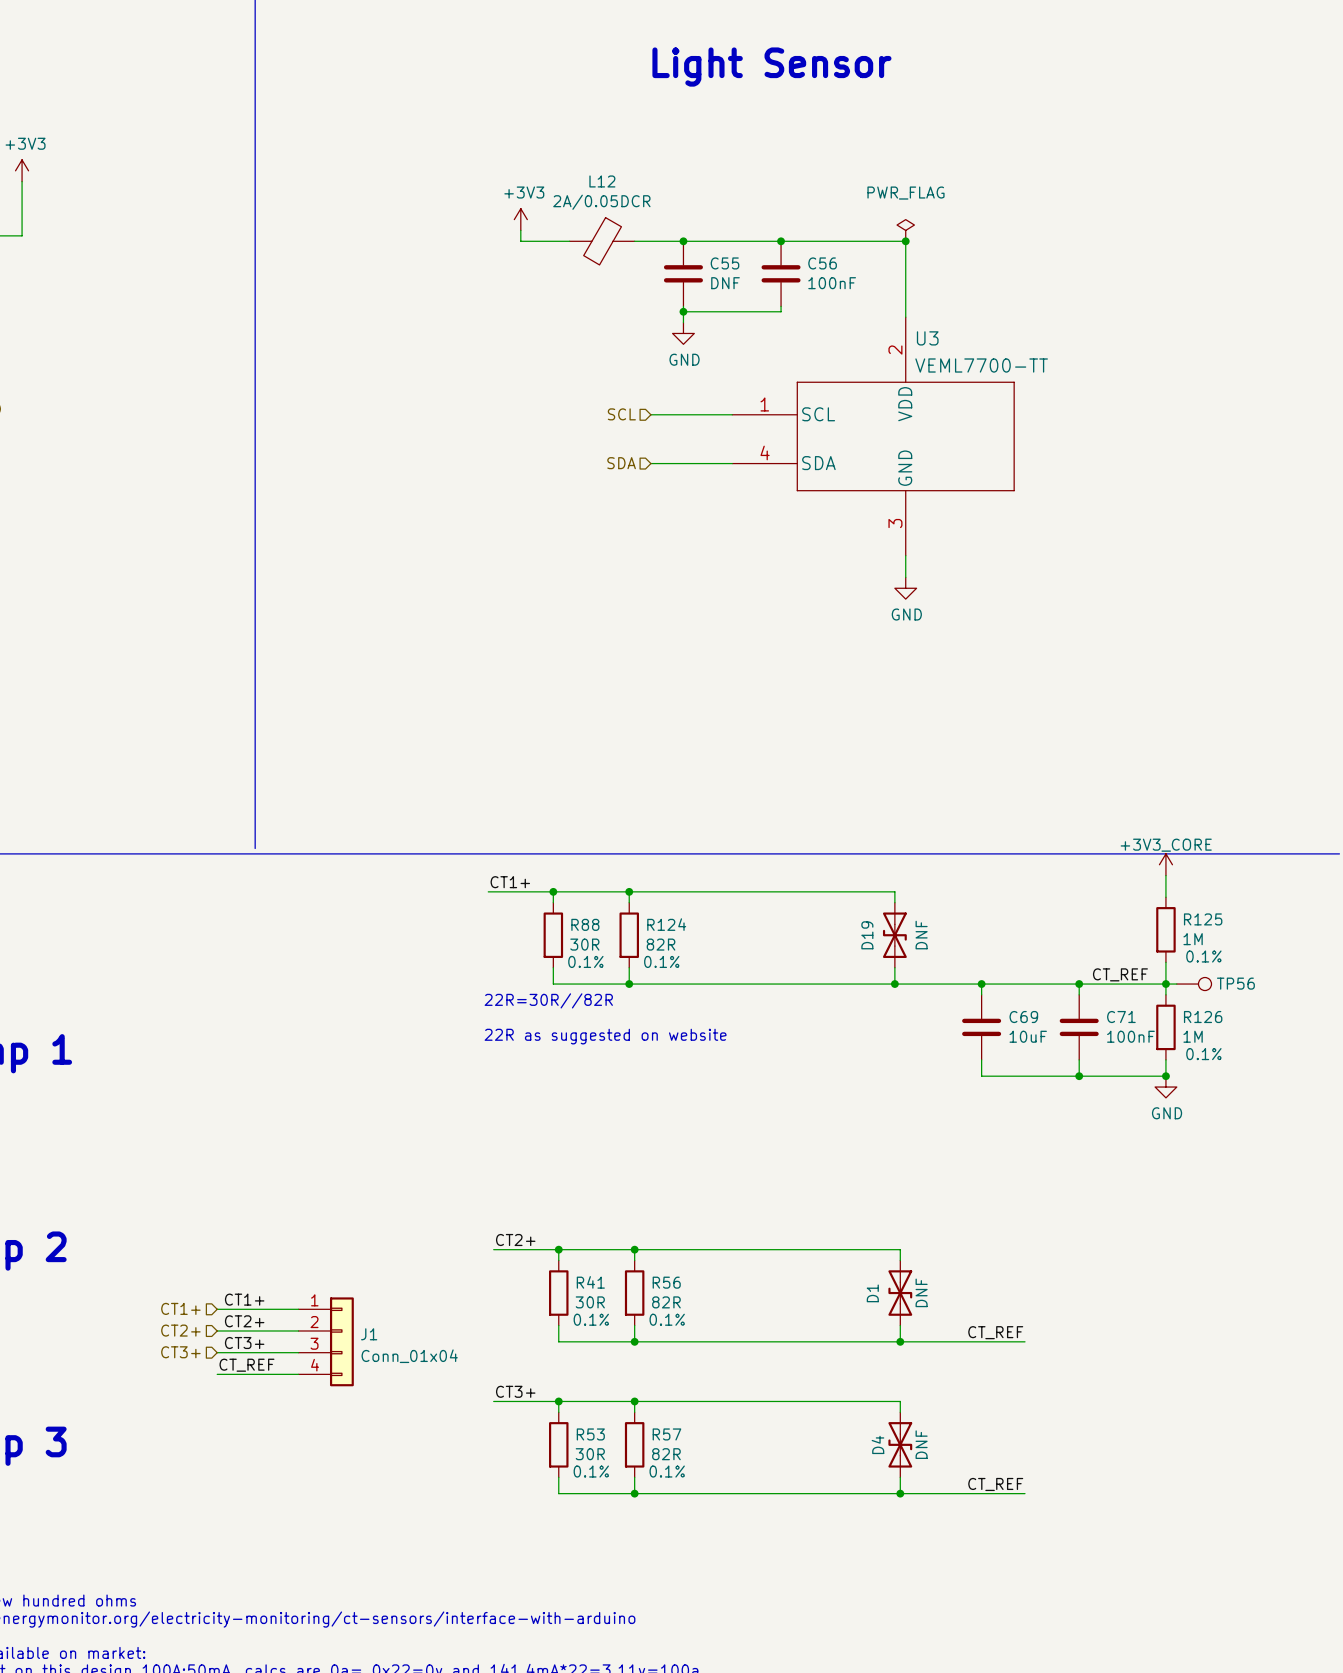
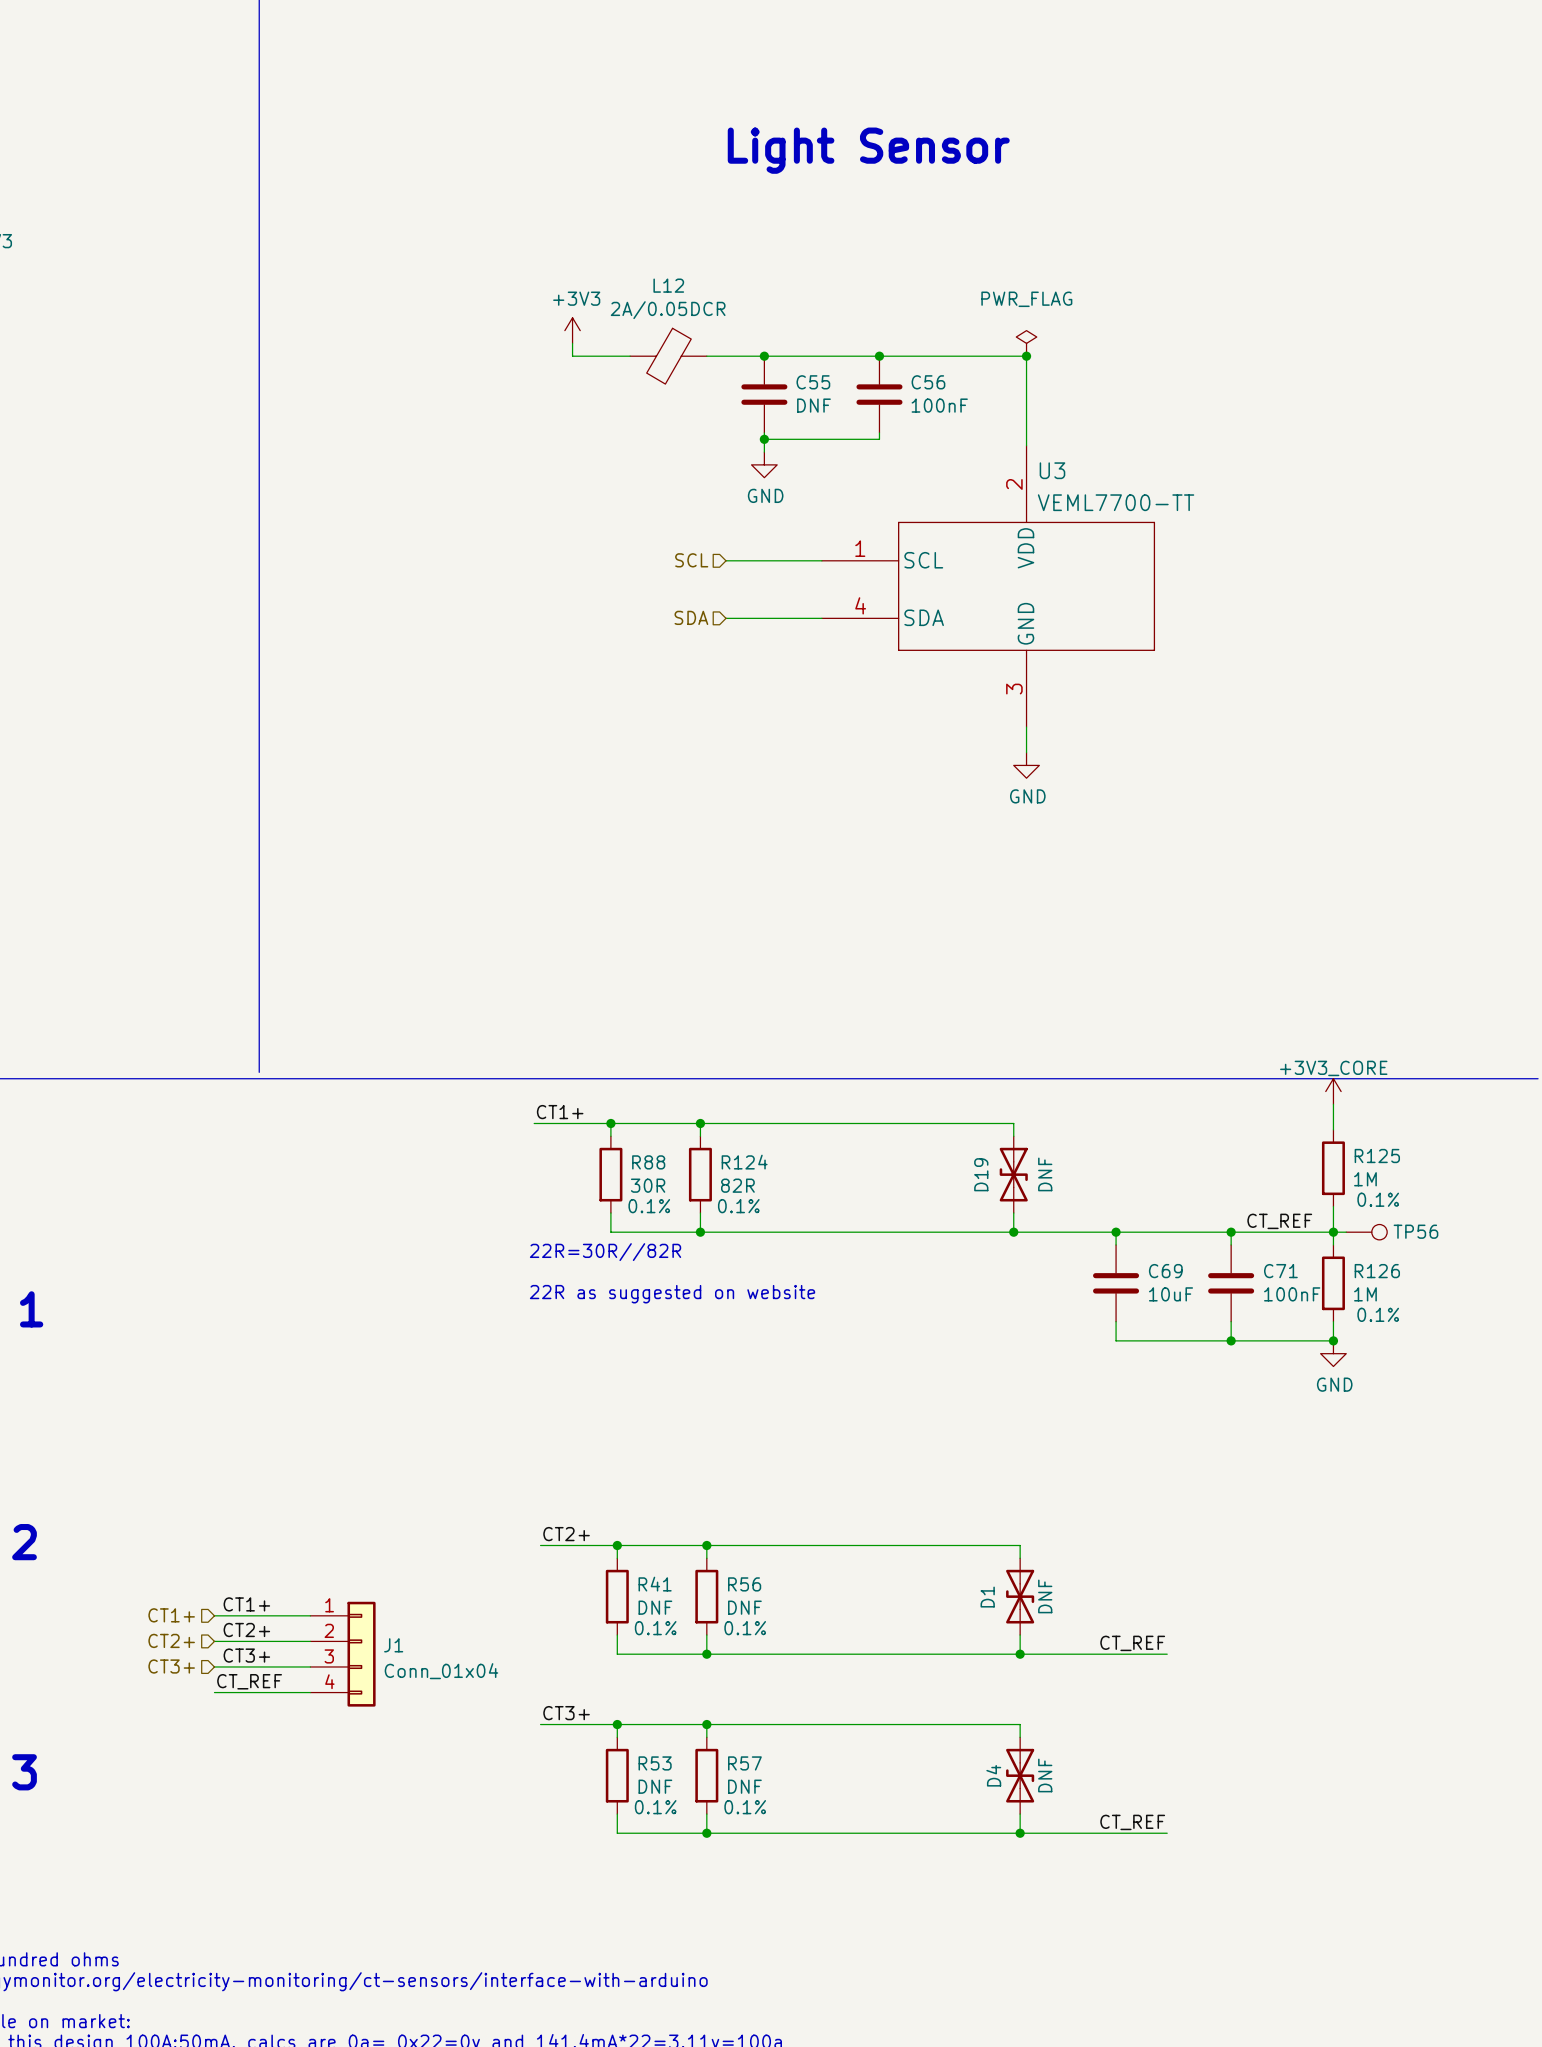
R41 value: 30R (590, 1302) -> DNF (655, 1607)
R56 value: 82R (666, 1302) -> DNF (744, 1607)
R53 value: 30R (590, 1454) -> DNF (655, 1786)
R57 value: 82R (666, 1454) -> DNF (744, 1786)

